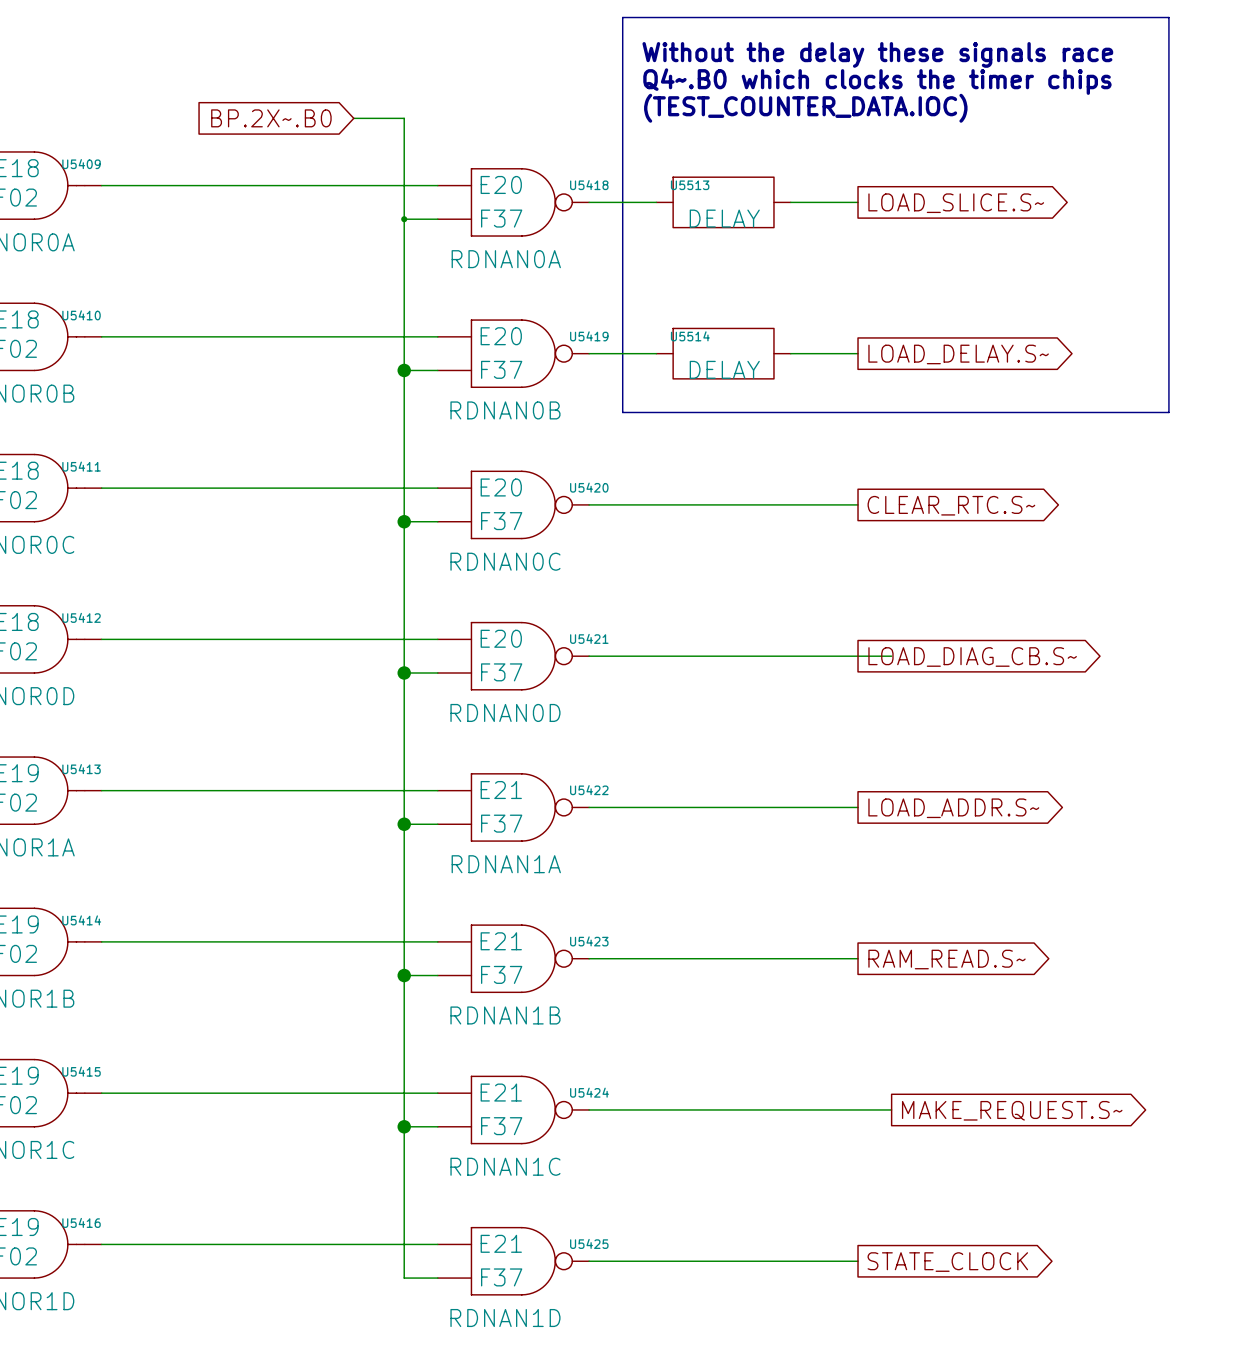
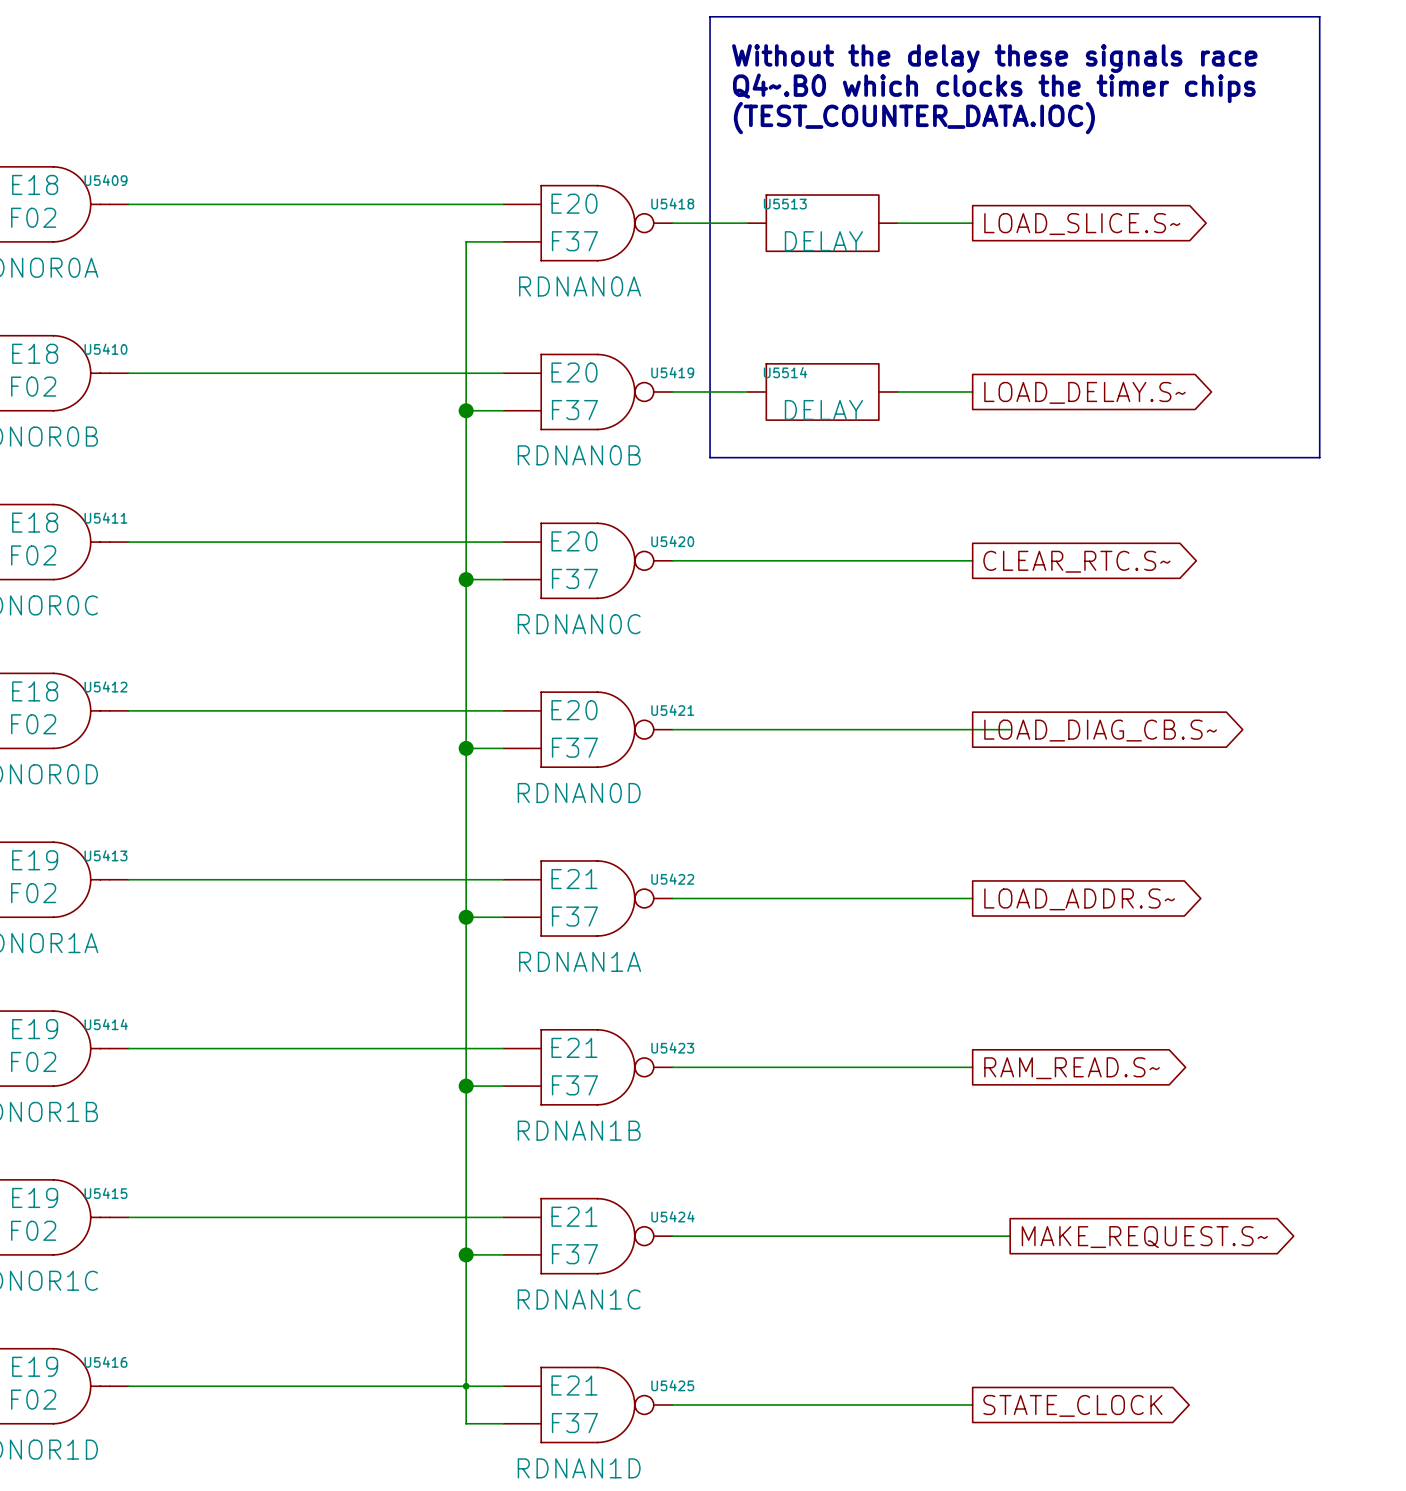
global label: BP.2X~.B0 (271, 118) -> none
wire: (353, 118) (404, 118) (404, 219) -> none
junction: (404, 219) -> none
junction: none -> (466, 1386)

